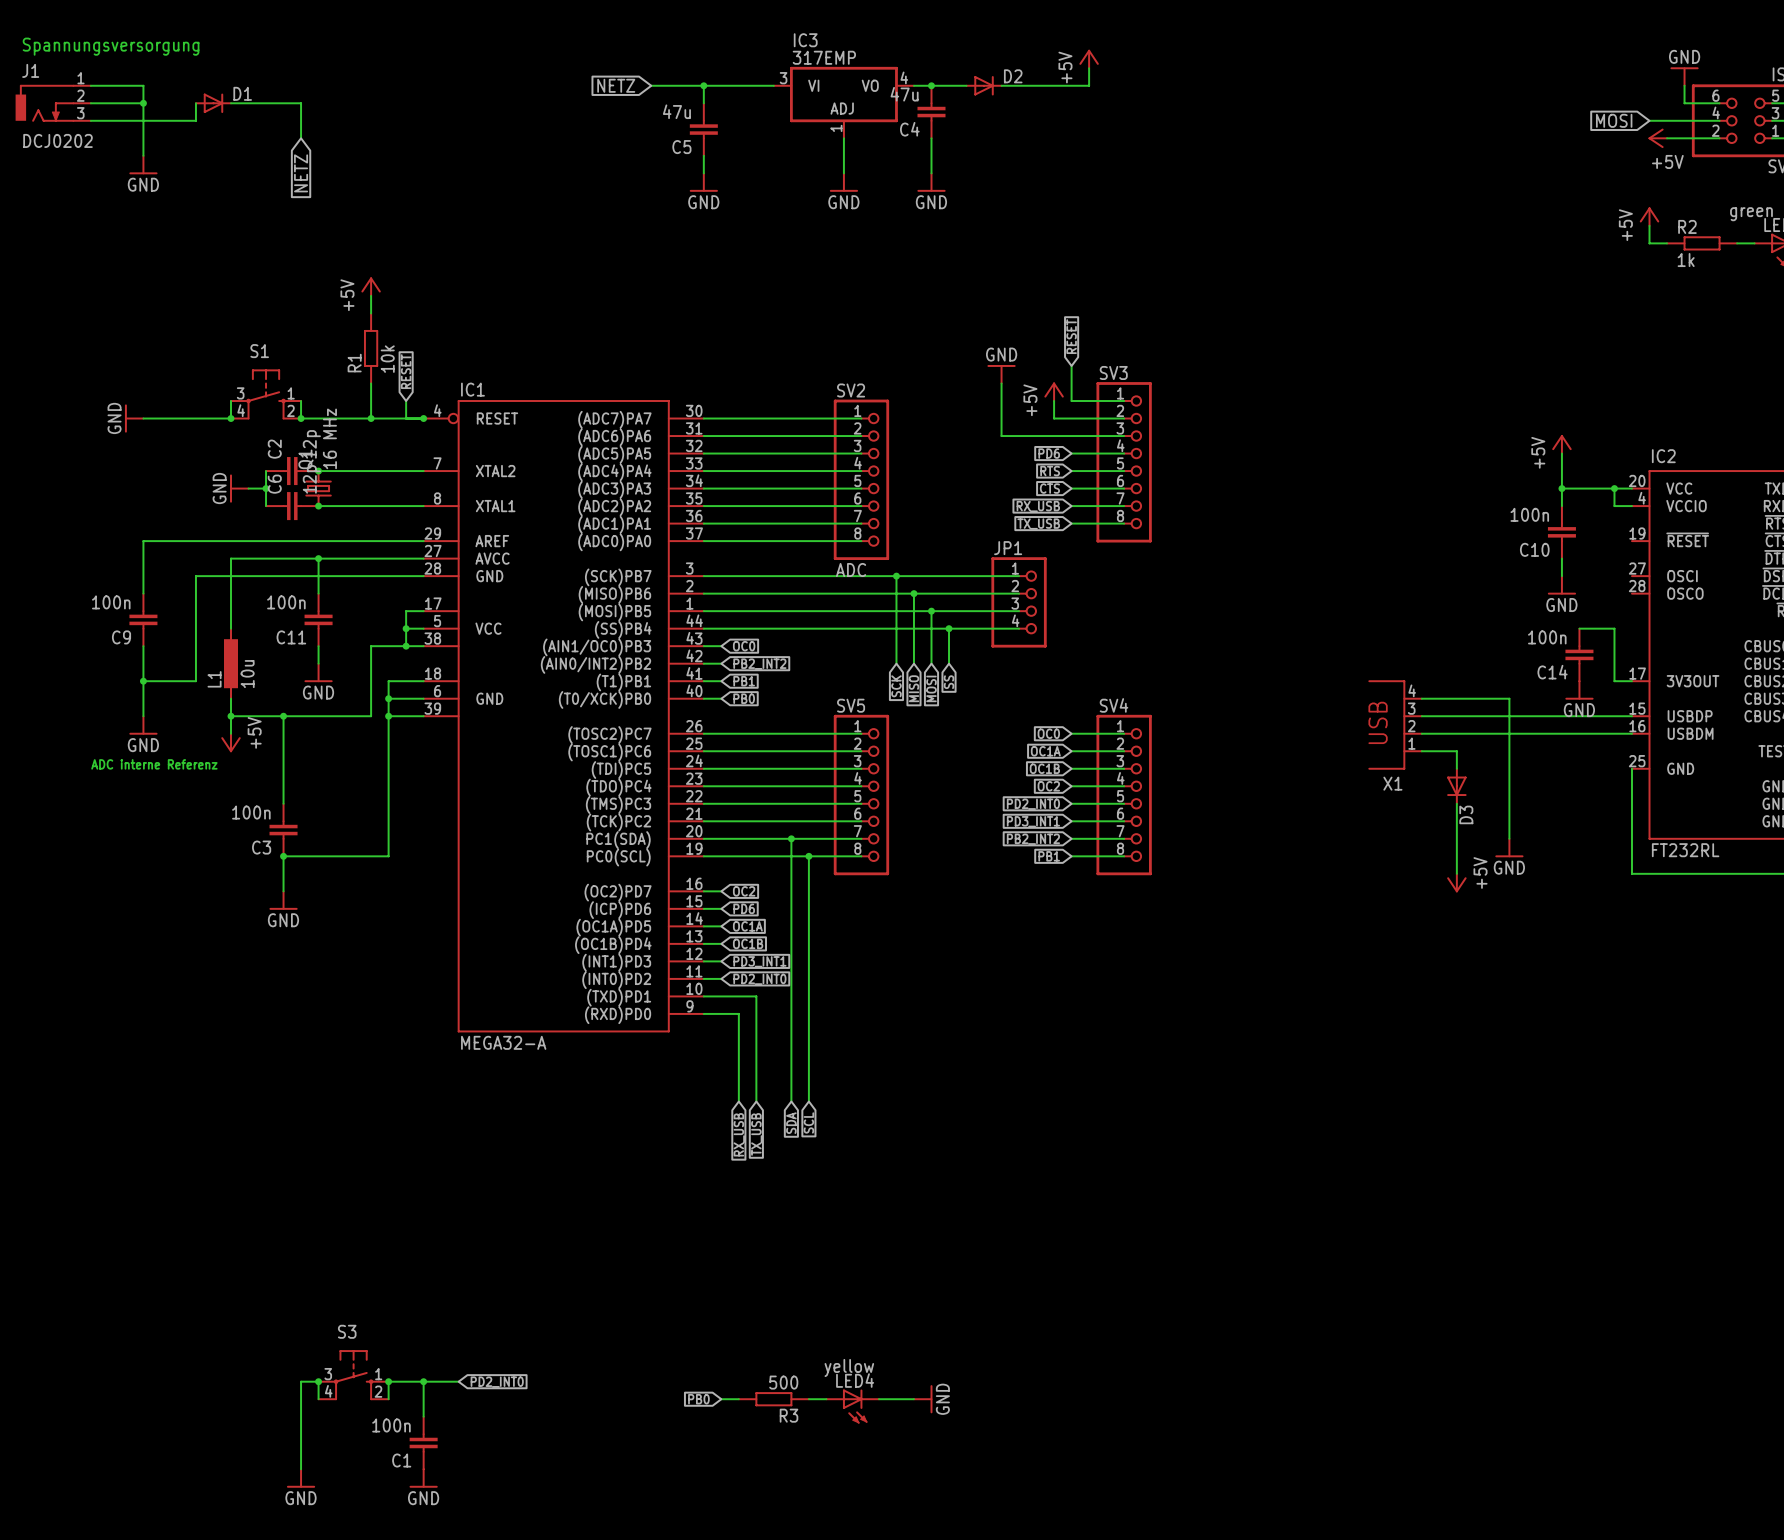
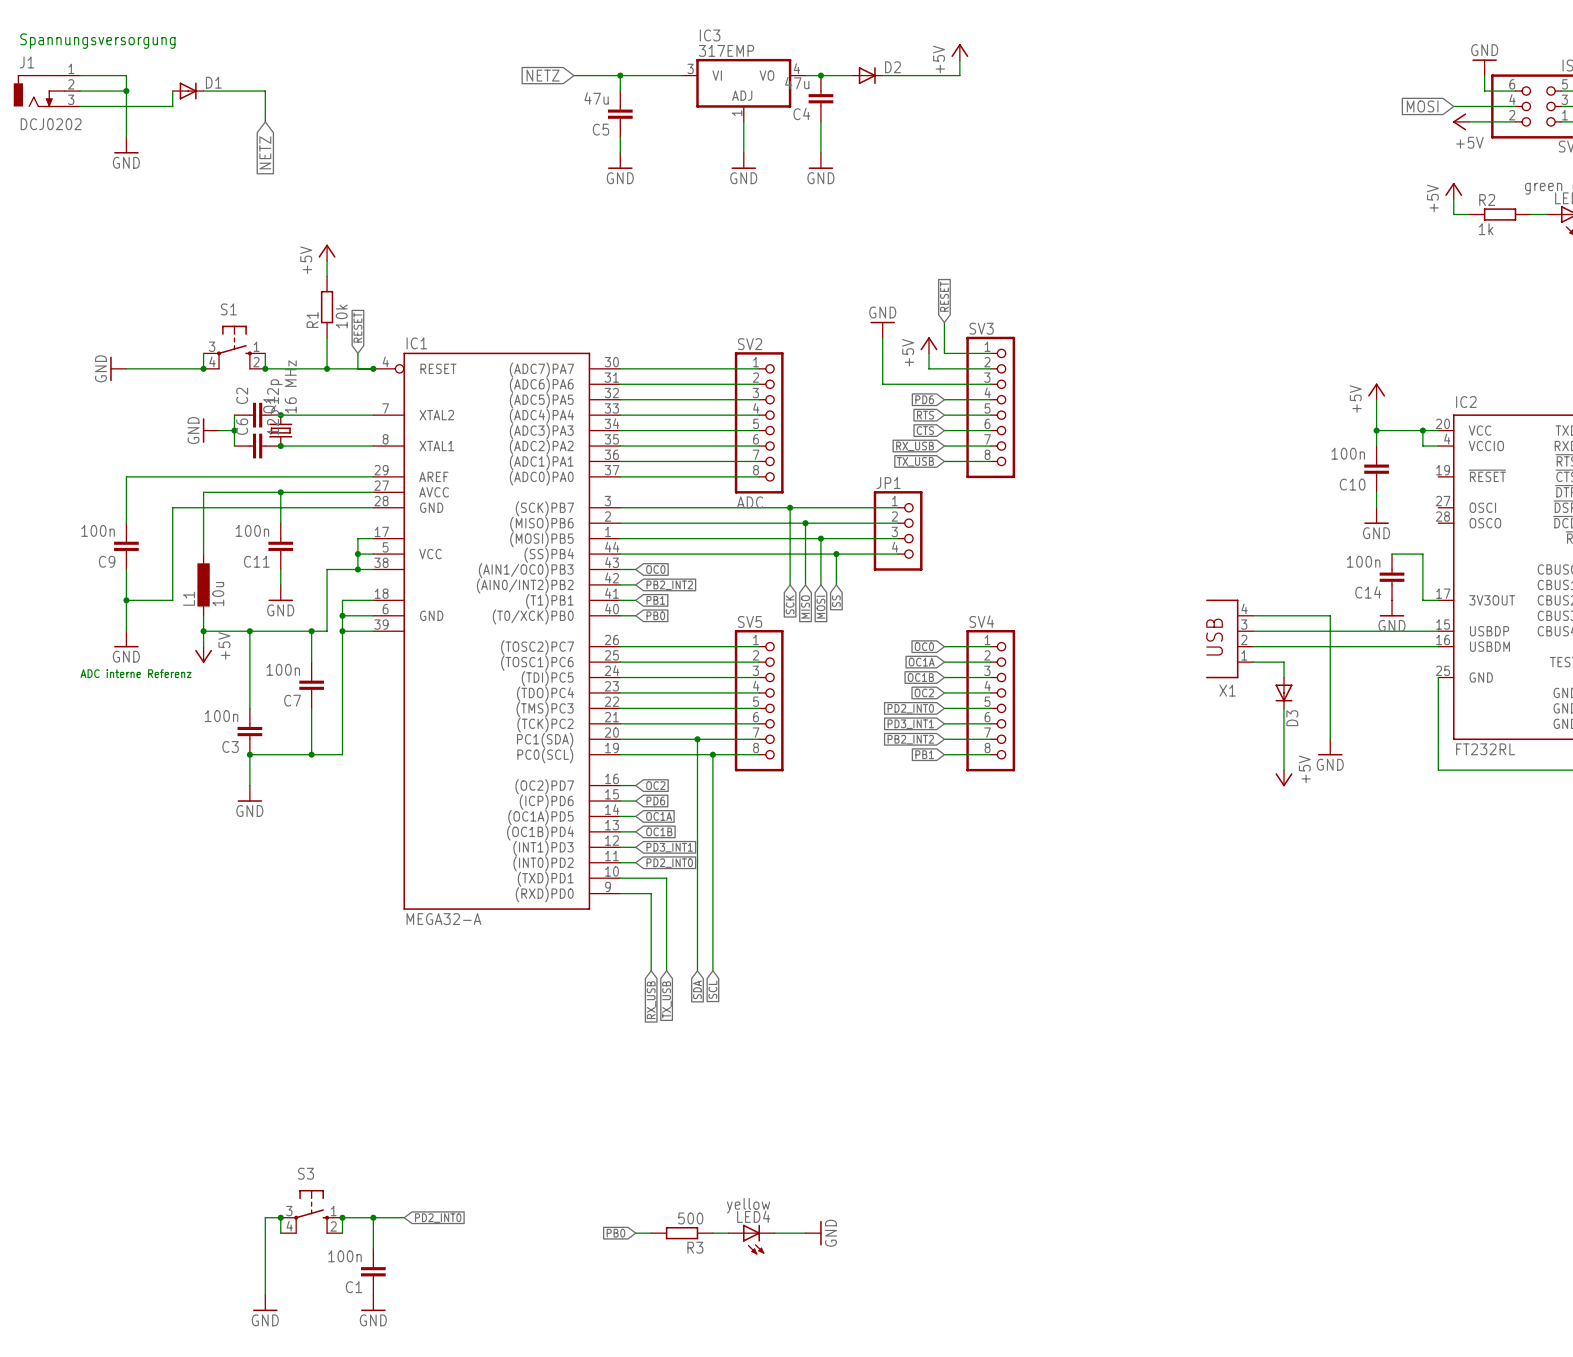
wire: none -> (311, 631) (311, 662)
junction: none -> (311, 631)
C7: none -> 100n (311, 685)
wire: none -> (311, 708) (311, 754)
junction: none -> (311, 754)

